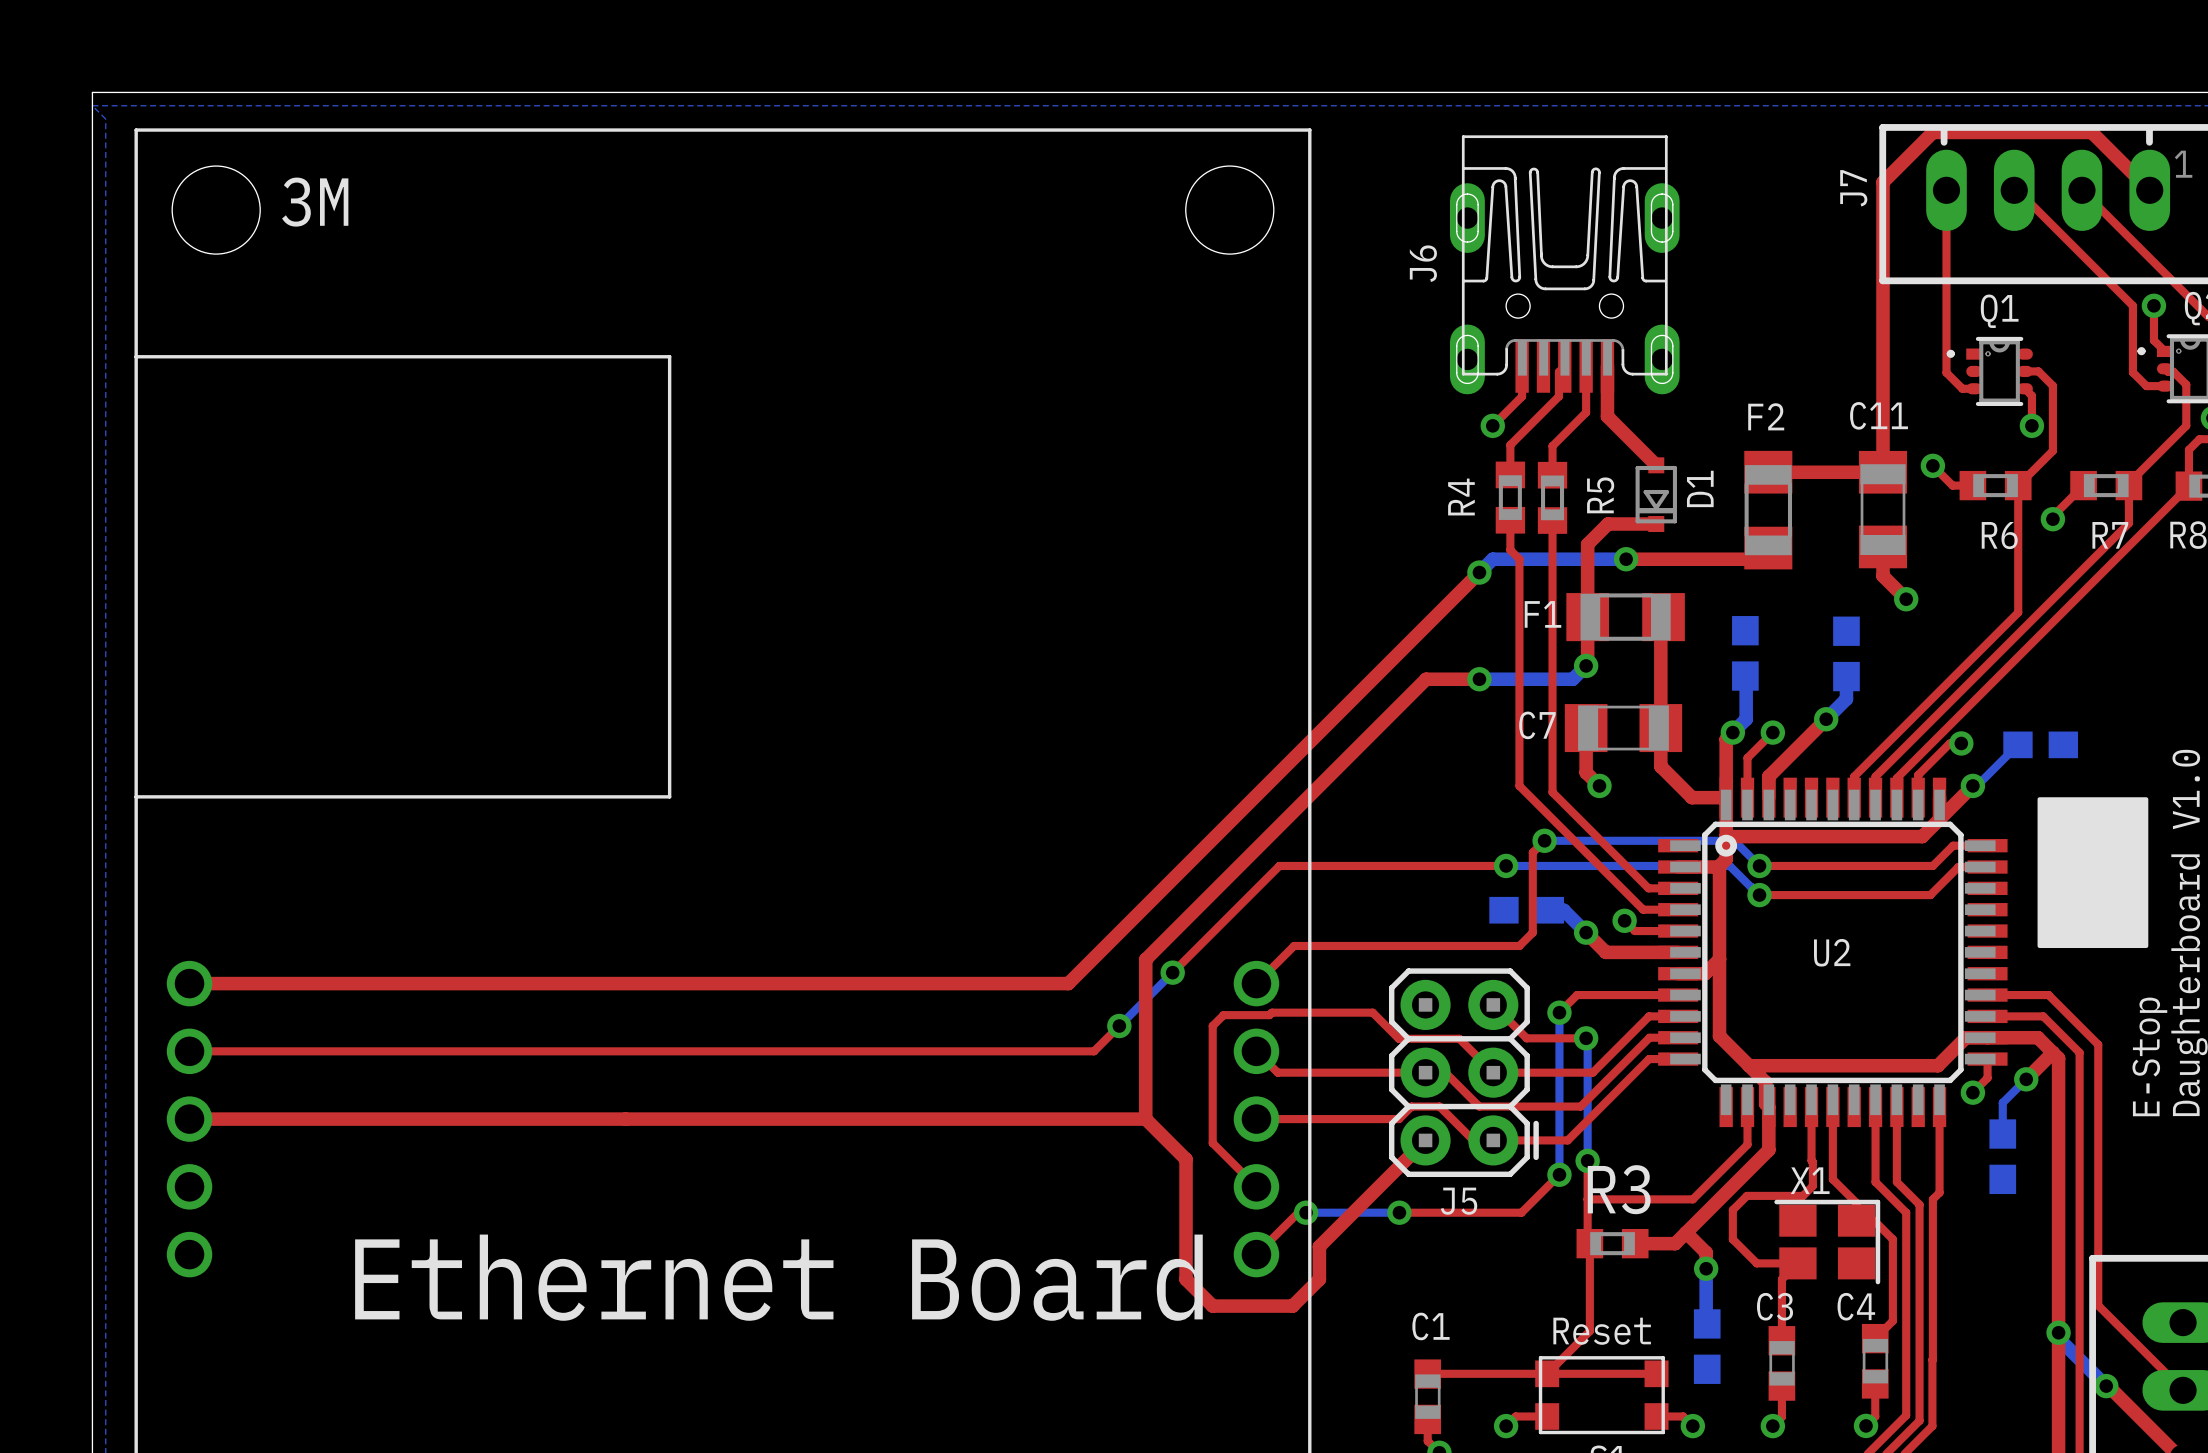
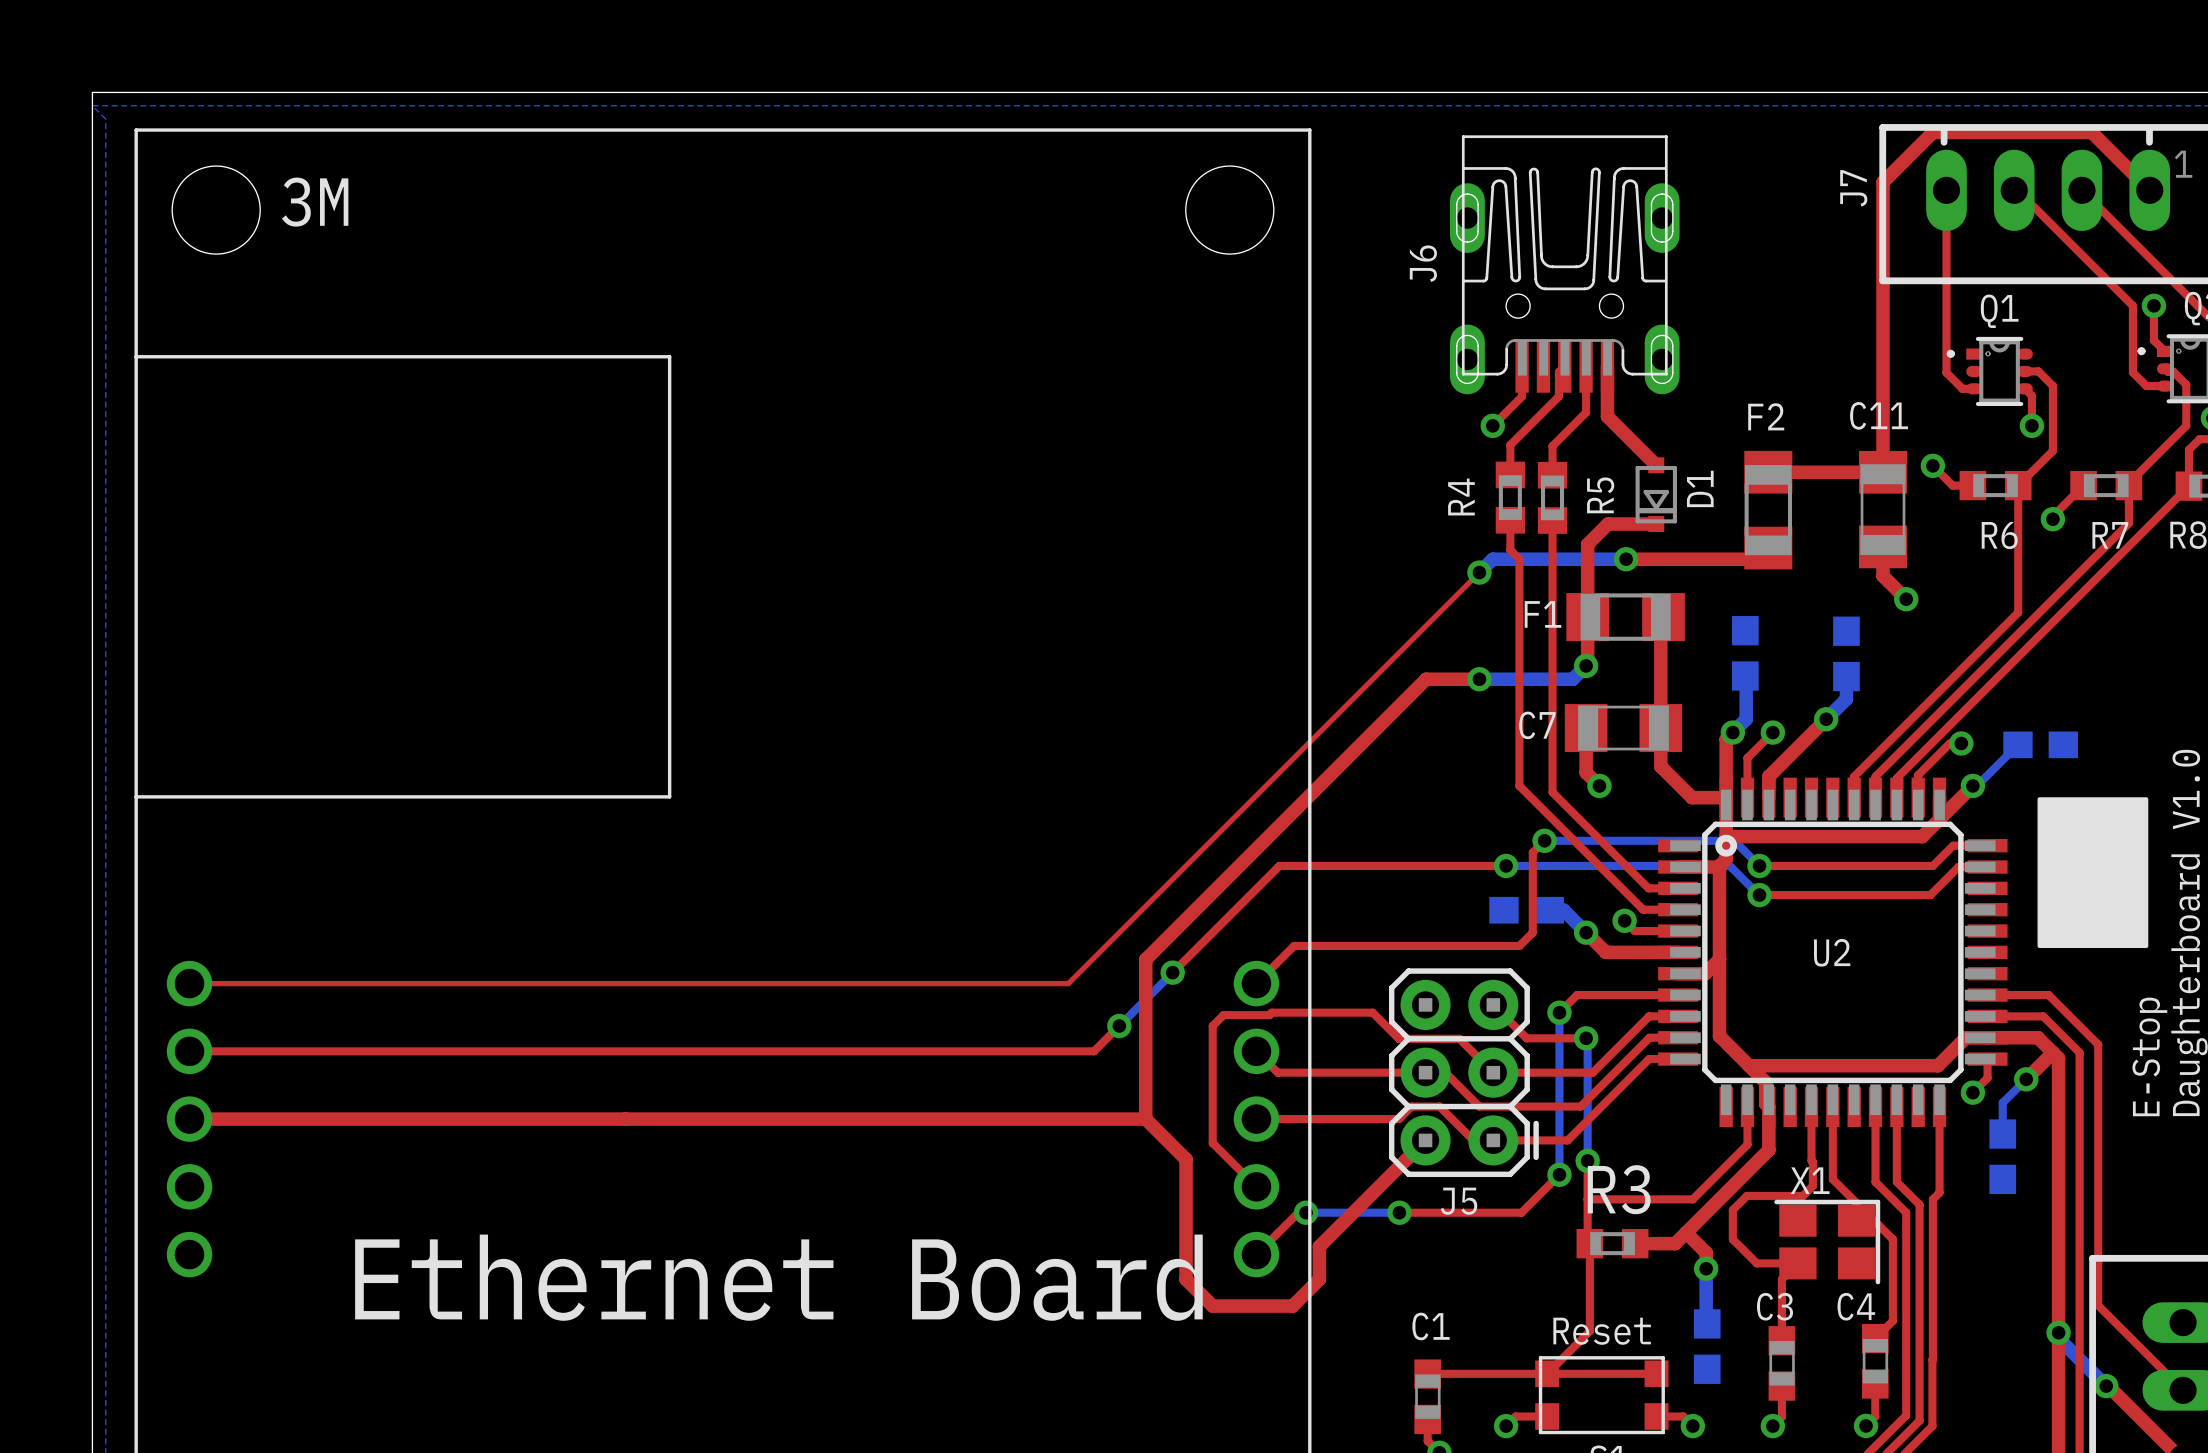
top track width: thick (1479, 572) (1068, 983) (189, 983) -> thin (1479, 572) (1068, 983) (189, 983)

